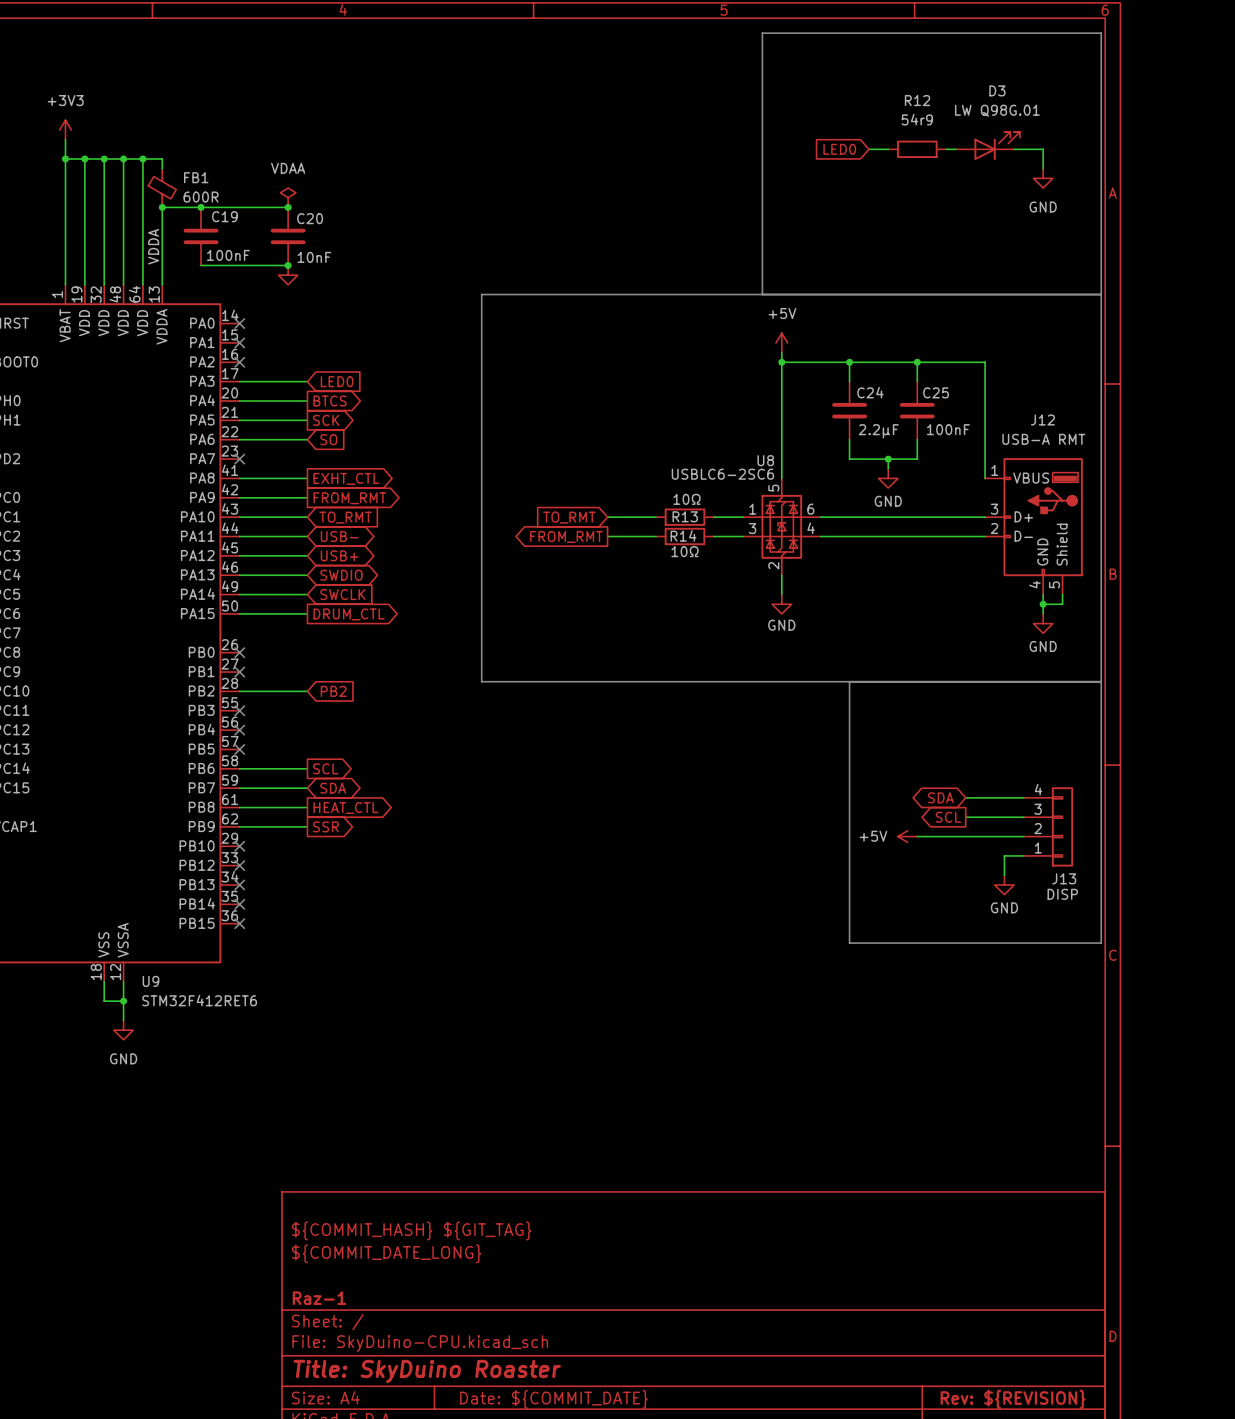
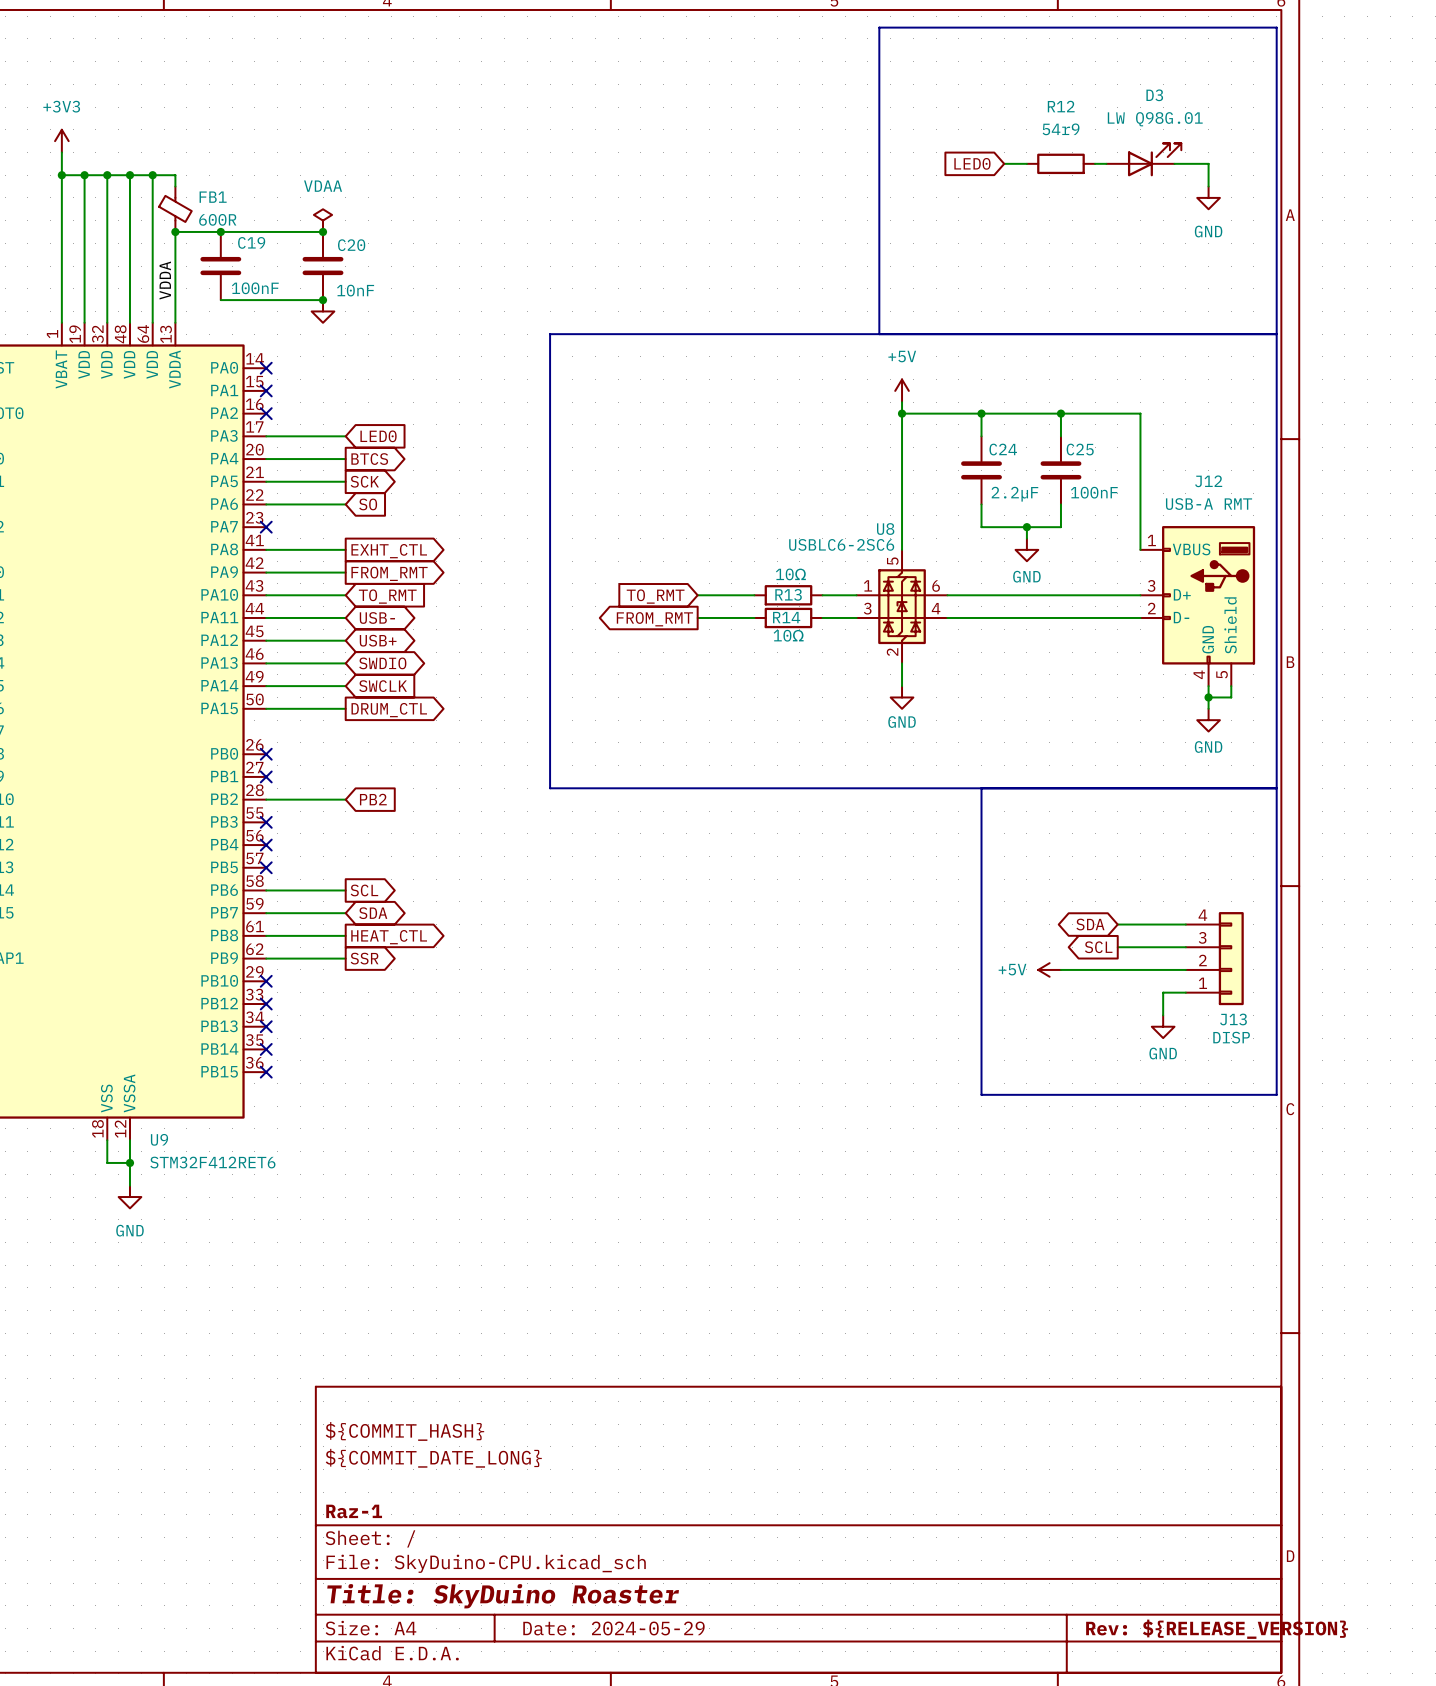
title block: ${COMMIT_HASH} ${GIT_TAG} (411, 1230) -> ${COMMIT_HASH} (404, 1431)
title block: Date: ${COMMIT_DATE} (553, 1399) -> Date: 2024-05-29 (613, 1628)
title block: Rev: ${REVISION} (1013, 1399) -> Rev: ${RELEASE_VERSION} (1217, 1629)

